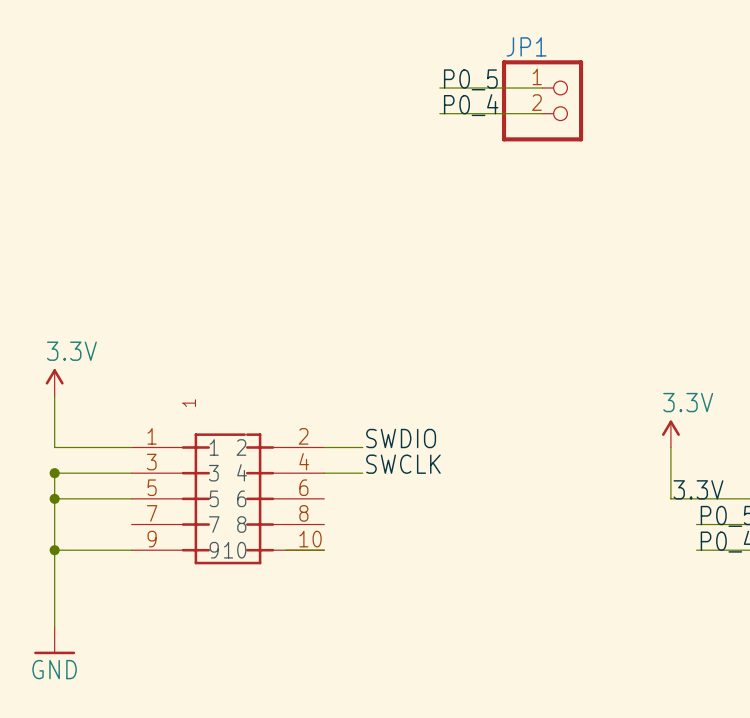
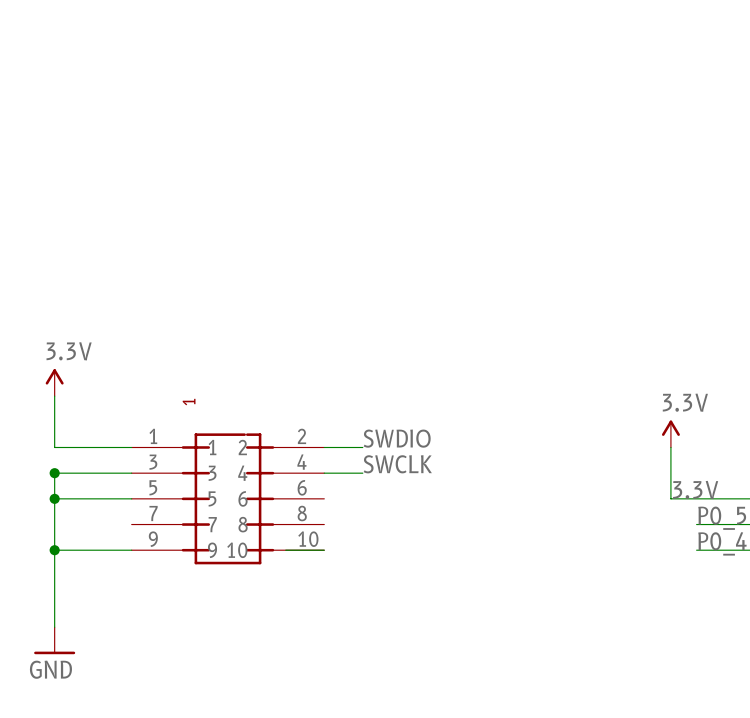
label: P0_5 (470, 79) -> none
wire: (439, 88) (542, 88) -> none
JP1: (542, 100) -> none
label: P0_4 (471, 105) -> none
wire: (439, 113) (542, 113) -> none

